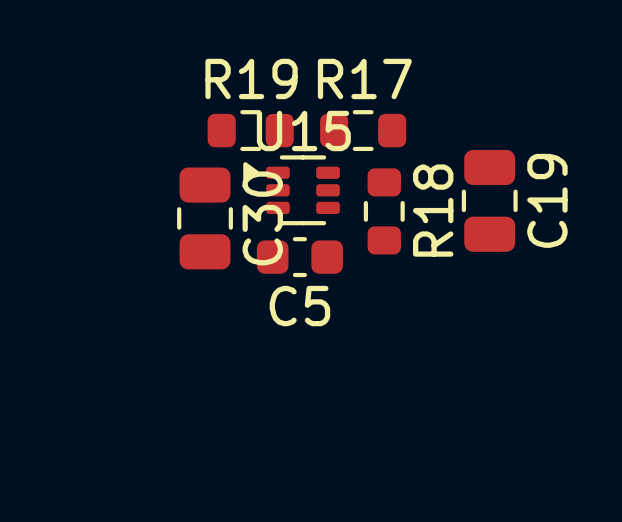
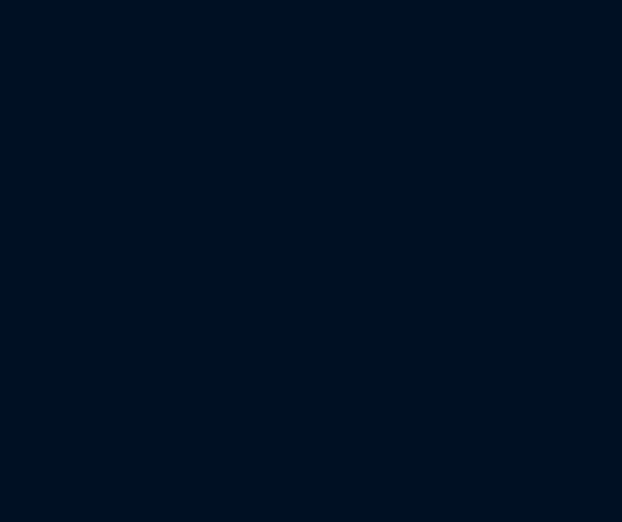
R19: (250, 130) -> none
R17: (363, 130) -> none
U15: (291, 190) -> none
C19: (489, 200) -> none
R18: (384, 211) -> none
C30: (205, 218) -> none
C5: (299, 257) -> none

